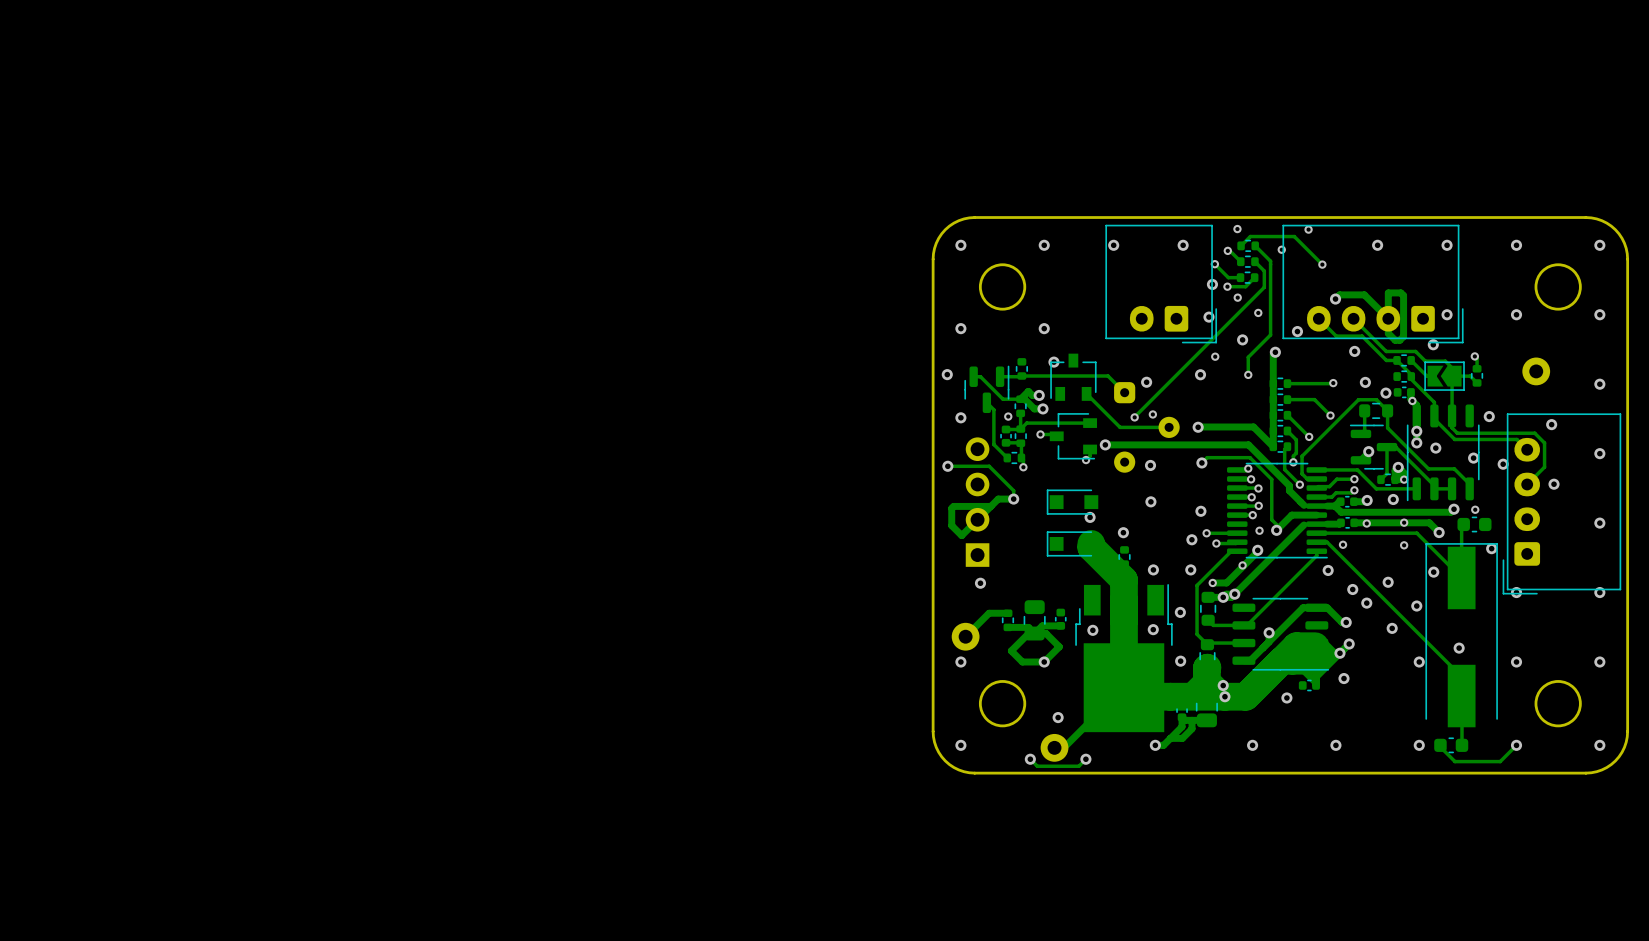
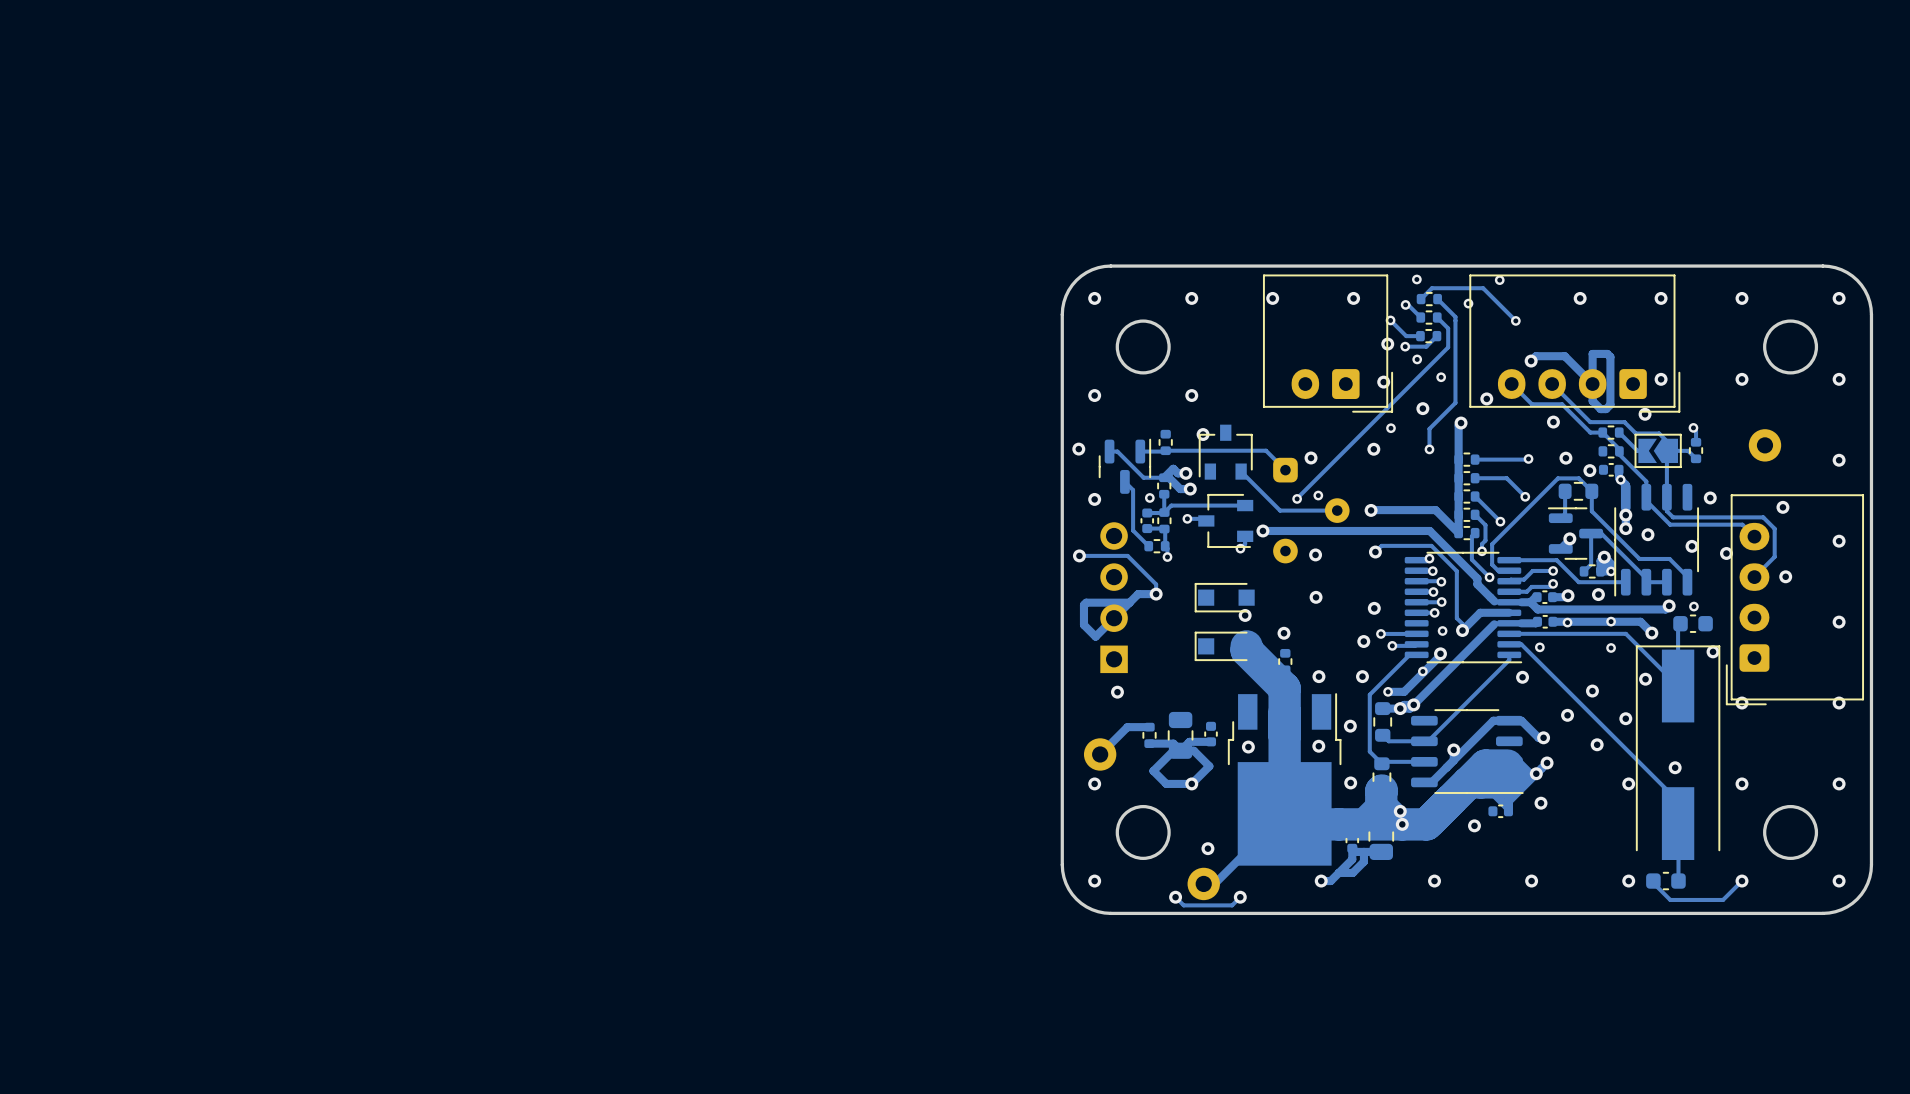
via: (1352, 589) -> none

